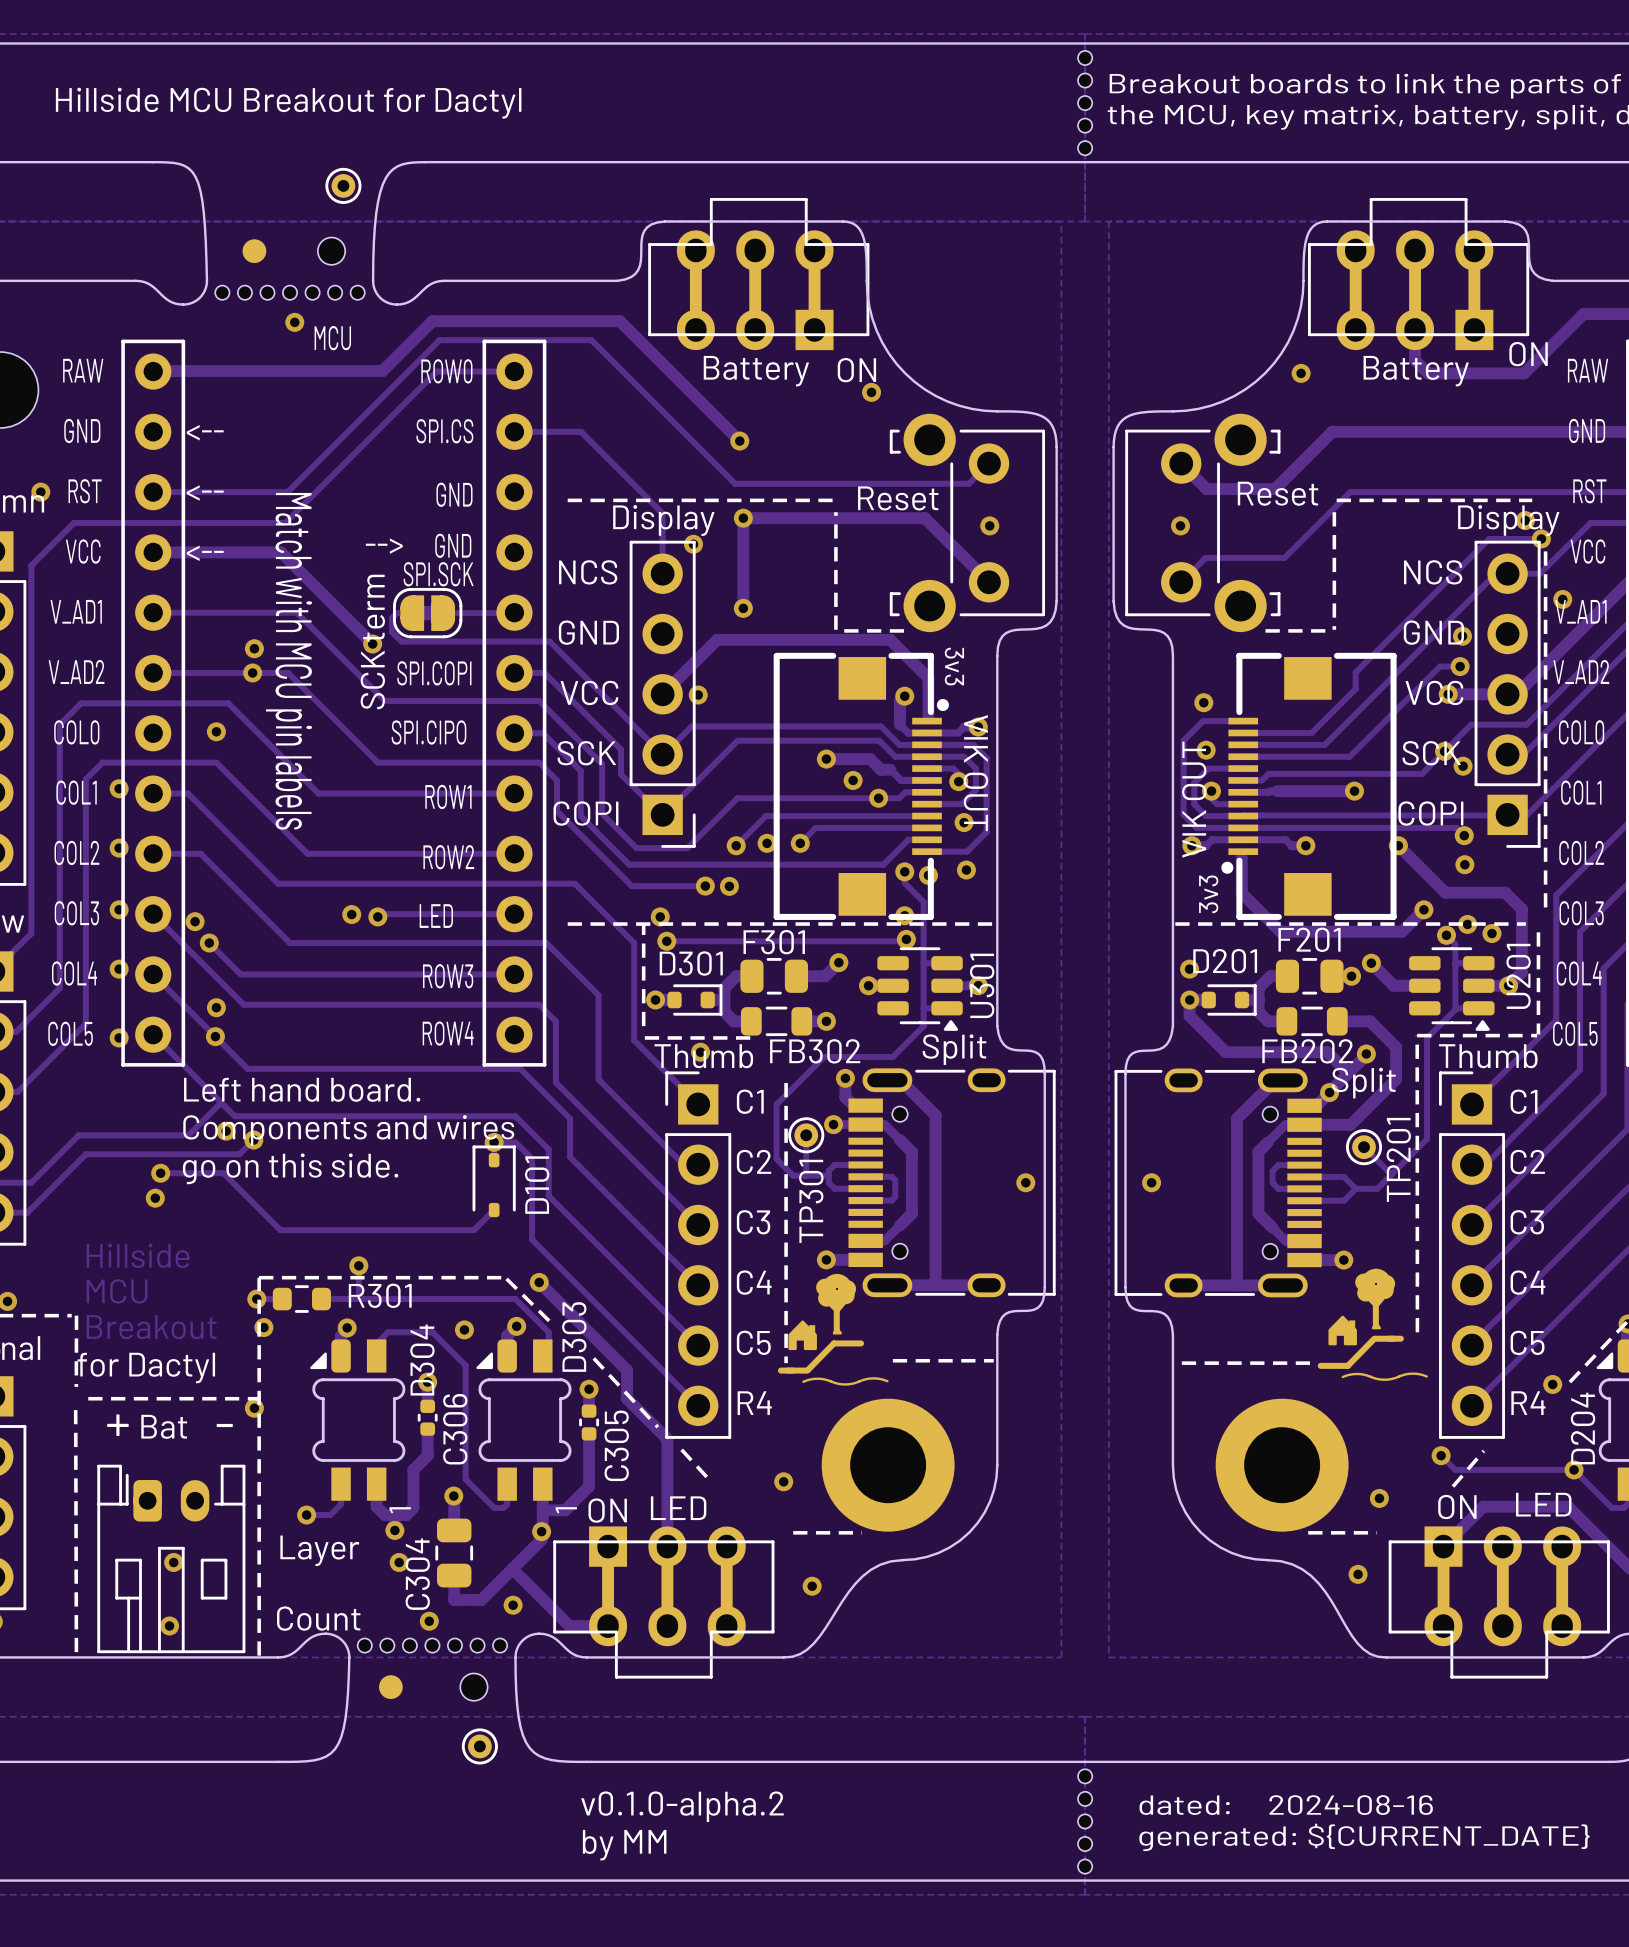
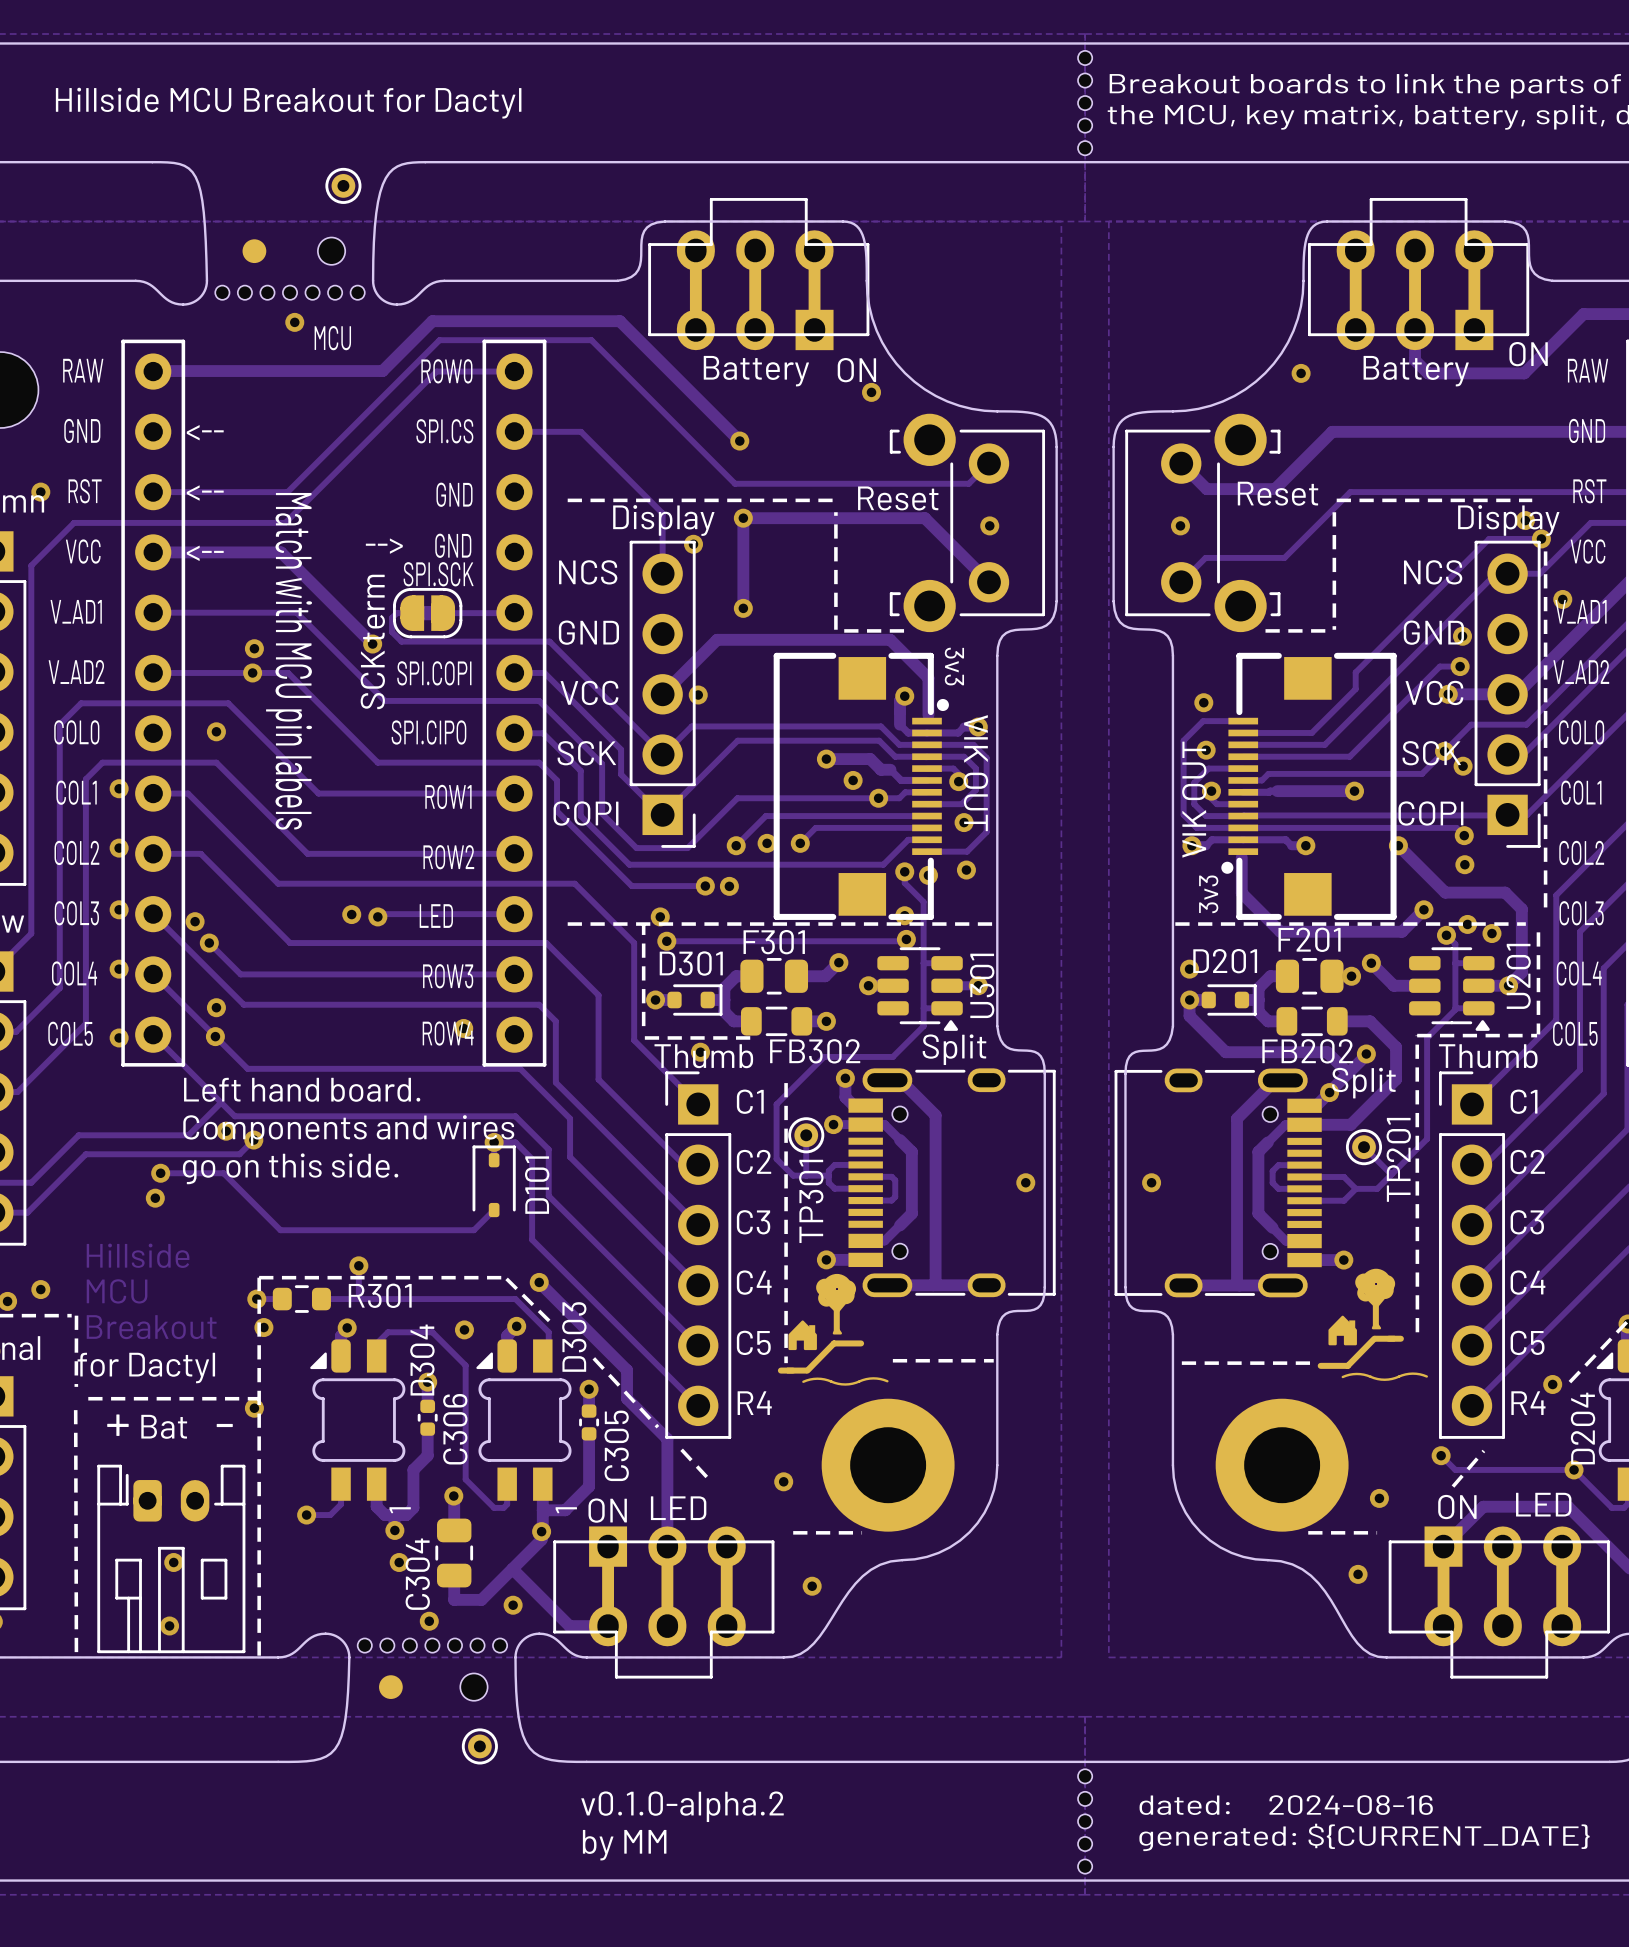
via: none -> (463, 1028)
via: none -> (40, 1289)
drawing: [277, 1535, 361, 1631] -> none

